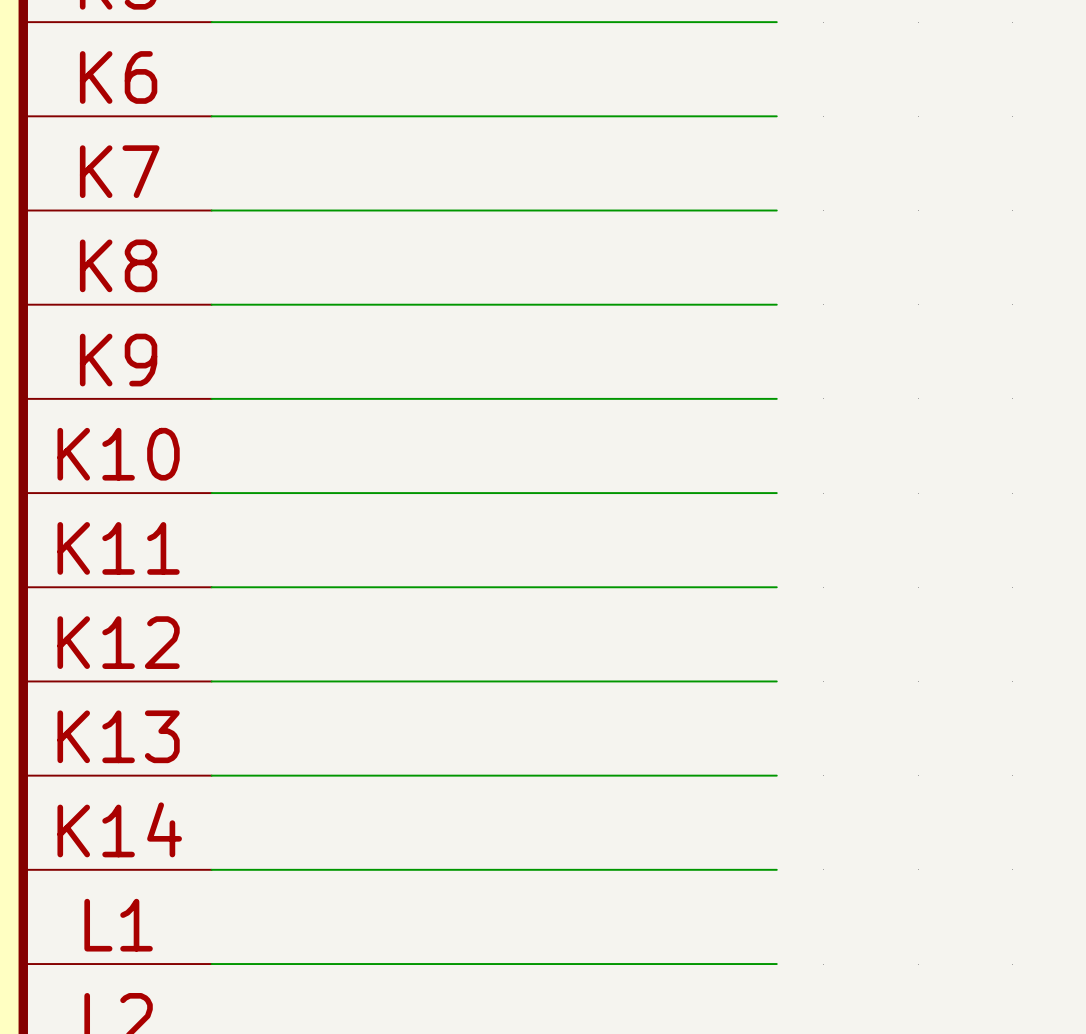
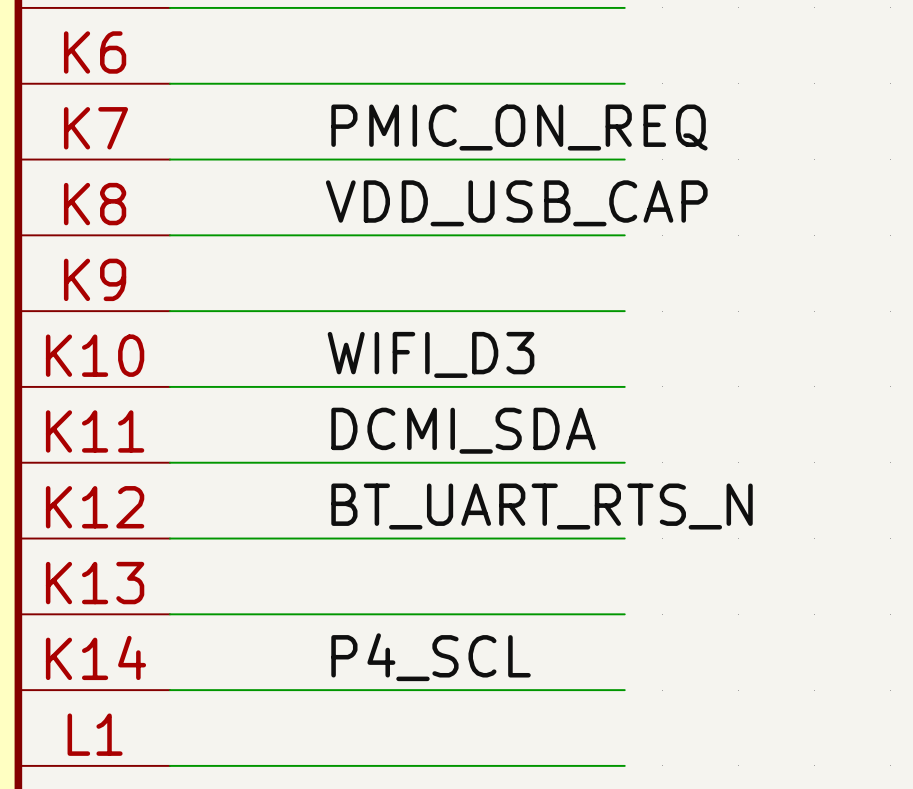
label: none -> PMIC_ON_REQ (519, 127)
label: none -> VDD_USB_CAP (516, 203)
label: none -> WIFI_D3 (431, 354)
label: none -> DCMI_SDA (463, 430)
label: none -> BT_UART_RTS_N (542, 506)
label: none -> P4_SCL (431, 657)

